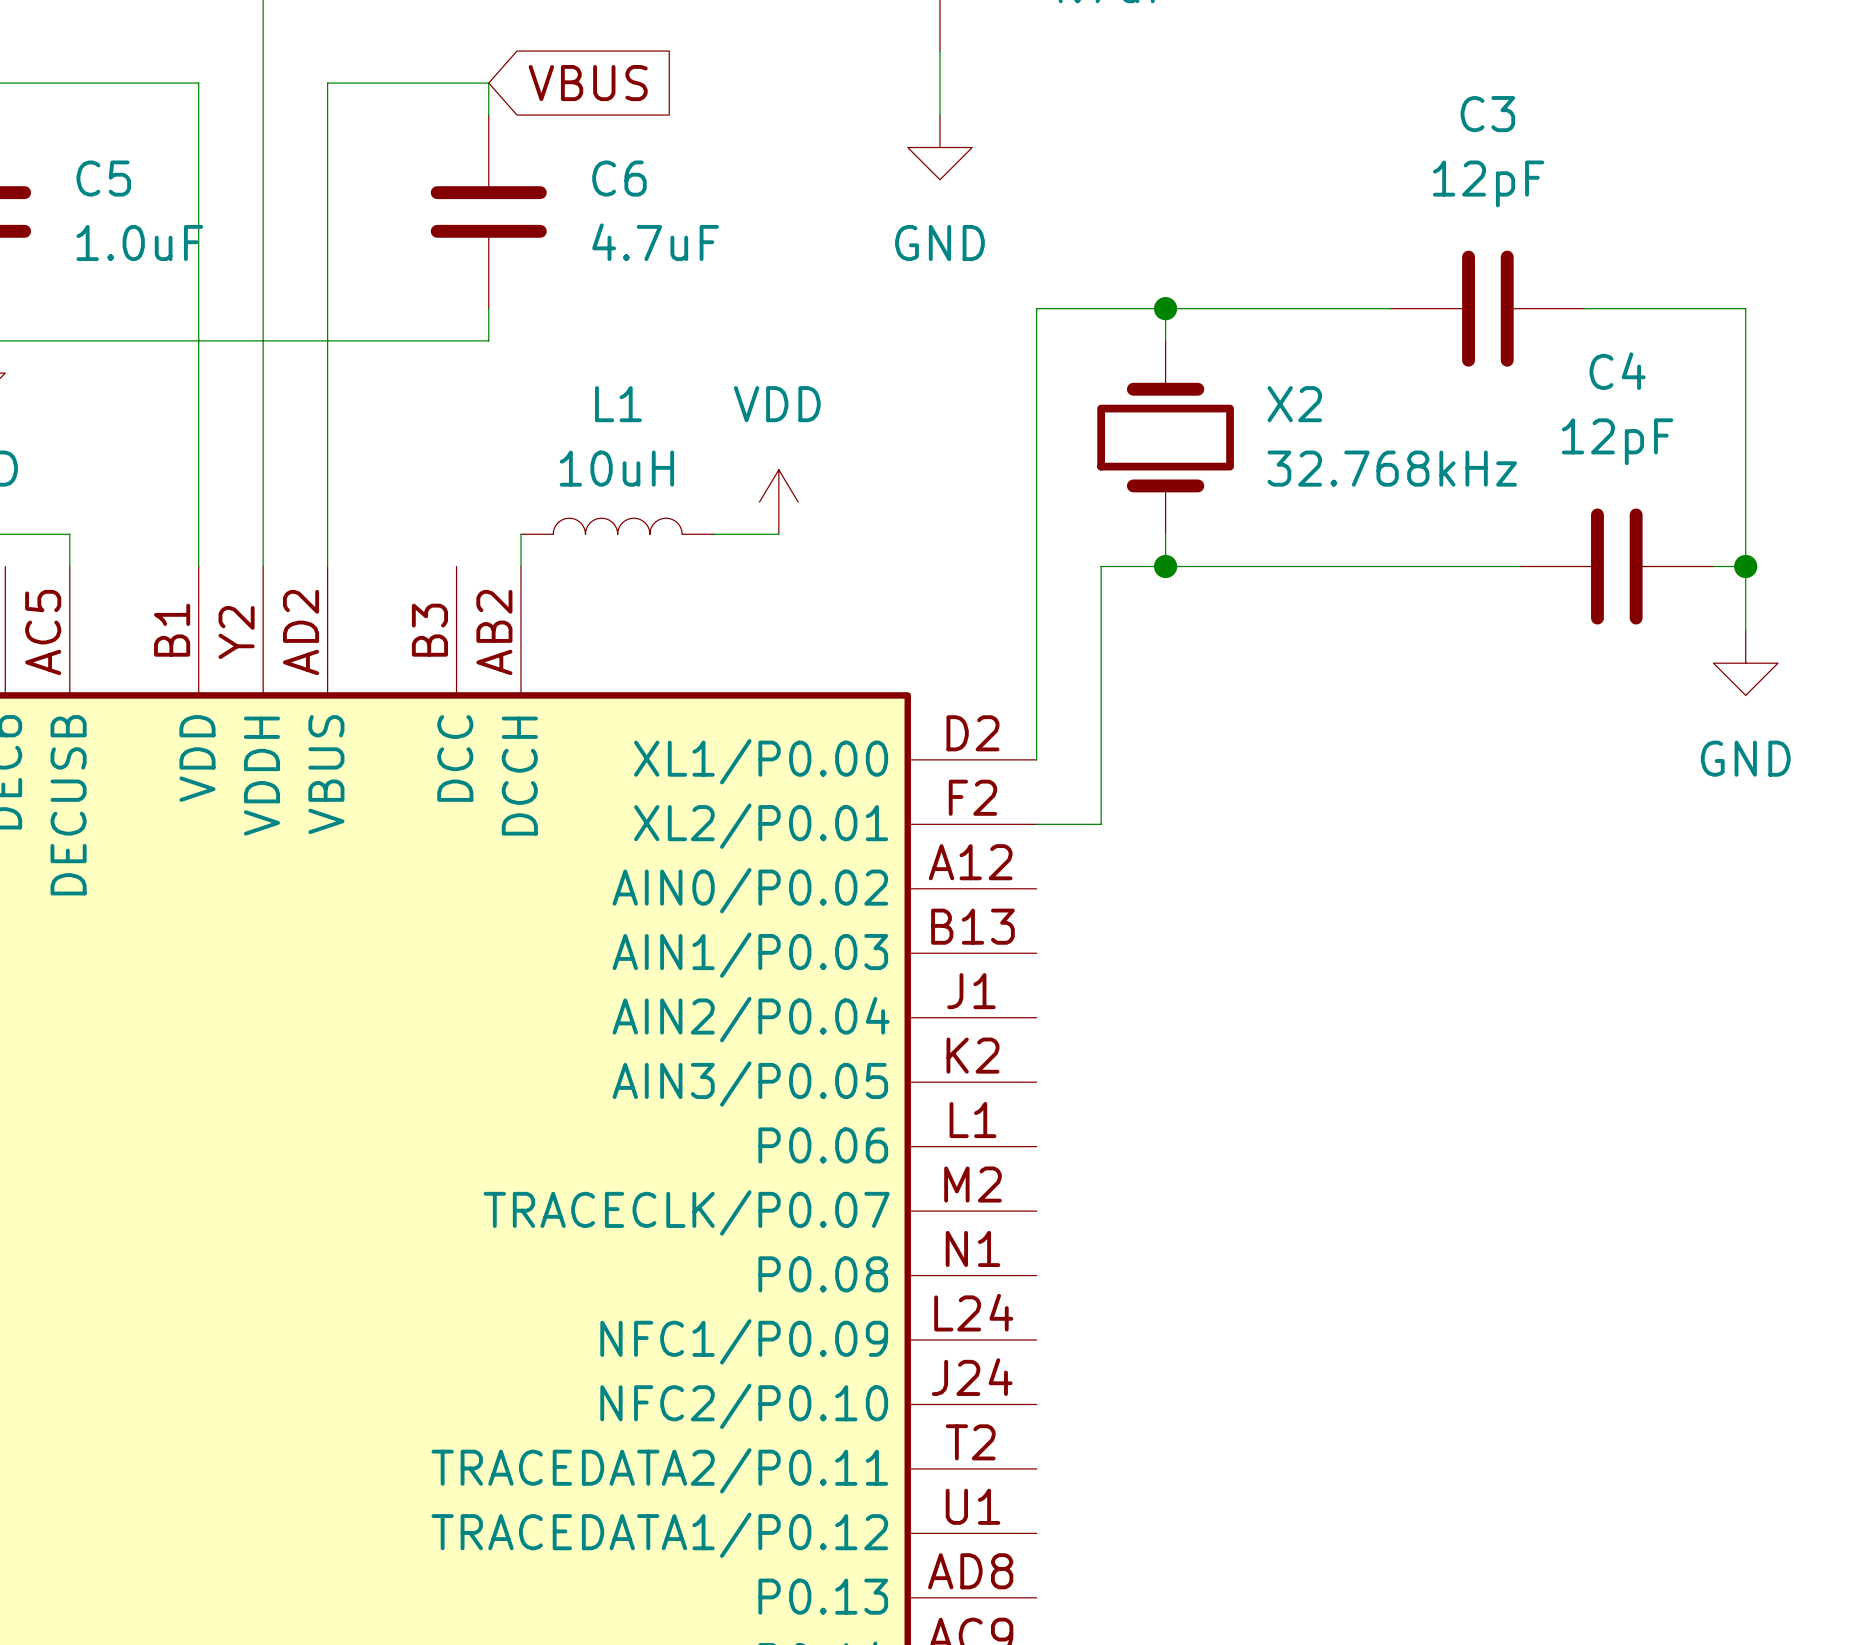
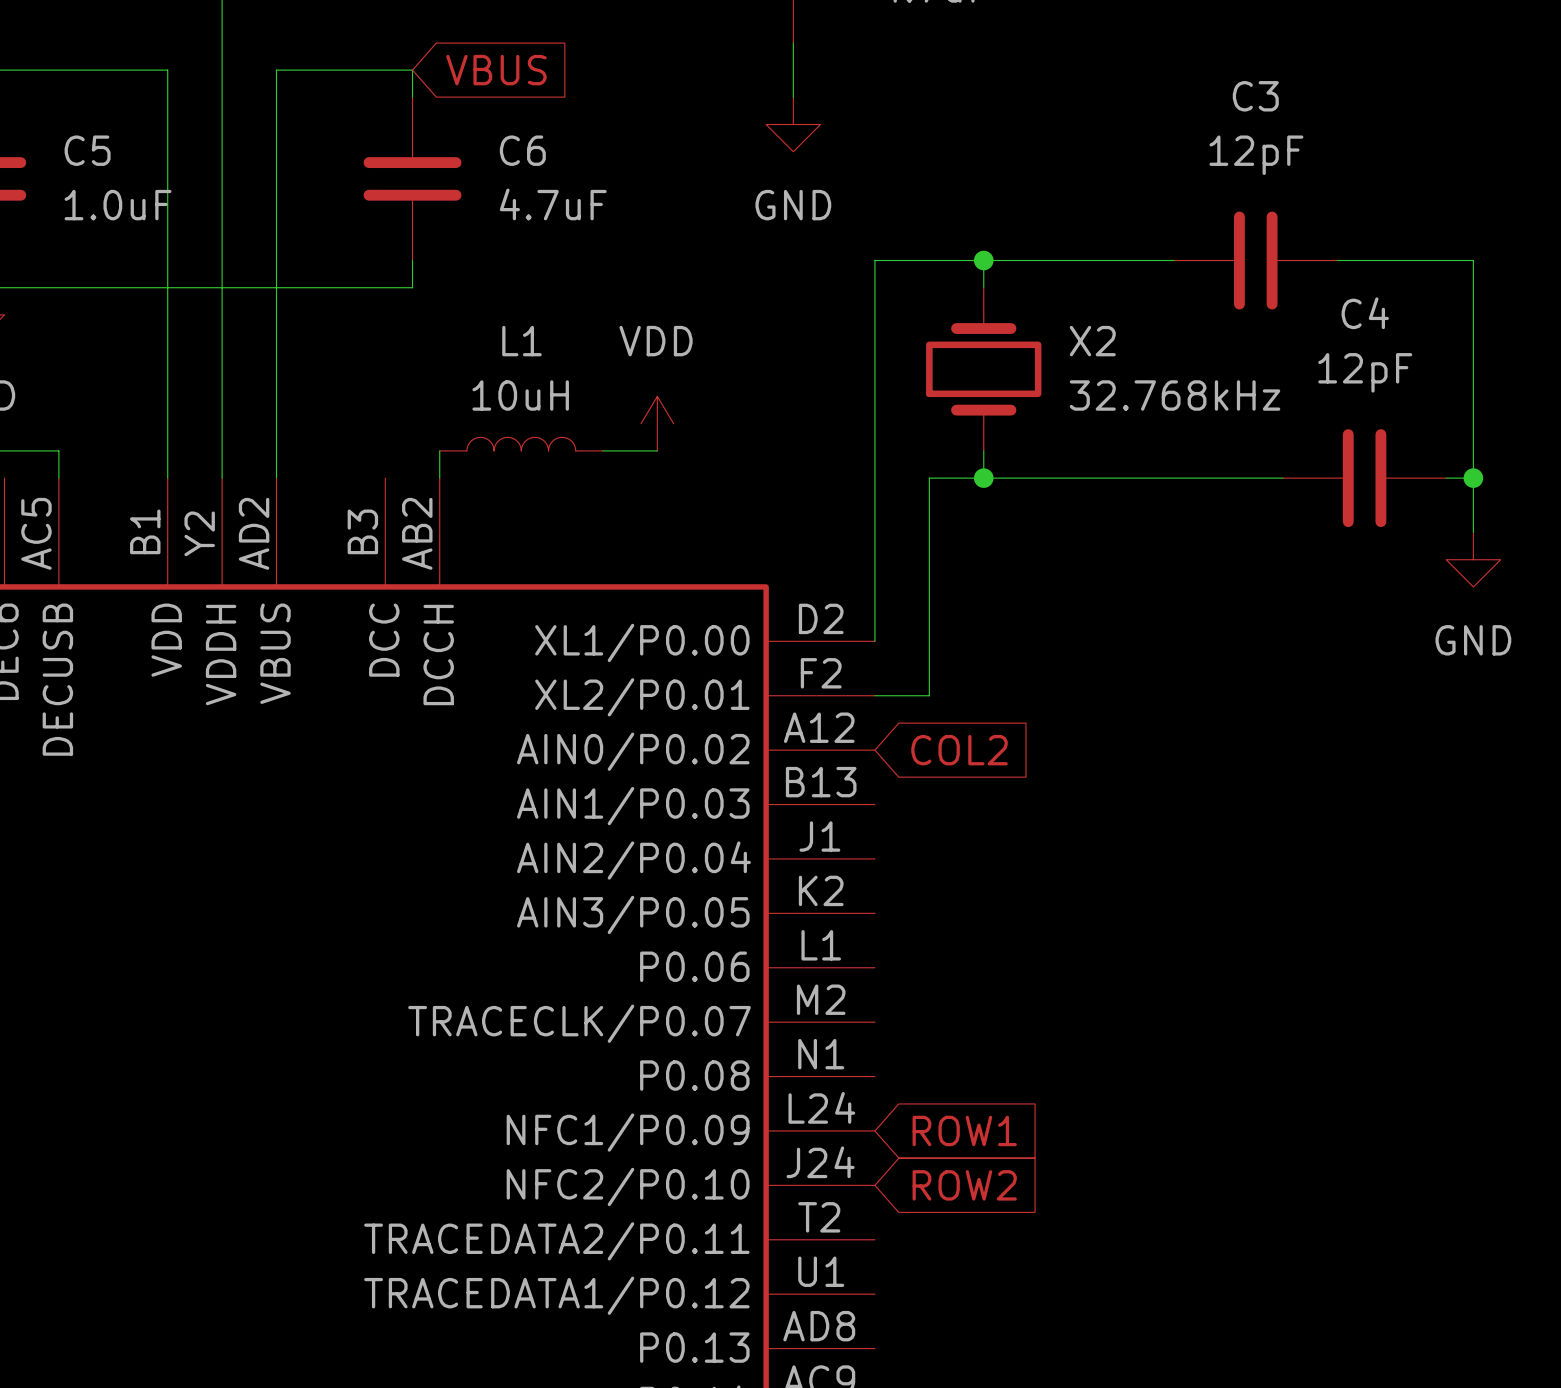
global label: none -> COL2 (959, 750)
global label: none -> ROW1 (964, 1130)
global label: none -> ROW2 (964, 1185)

